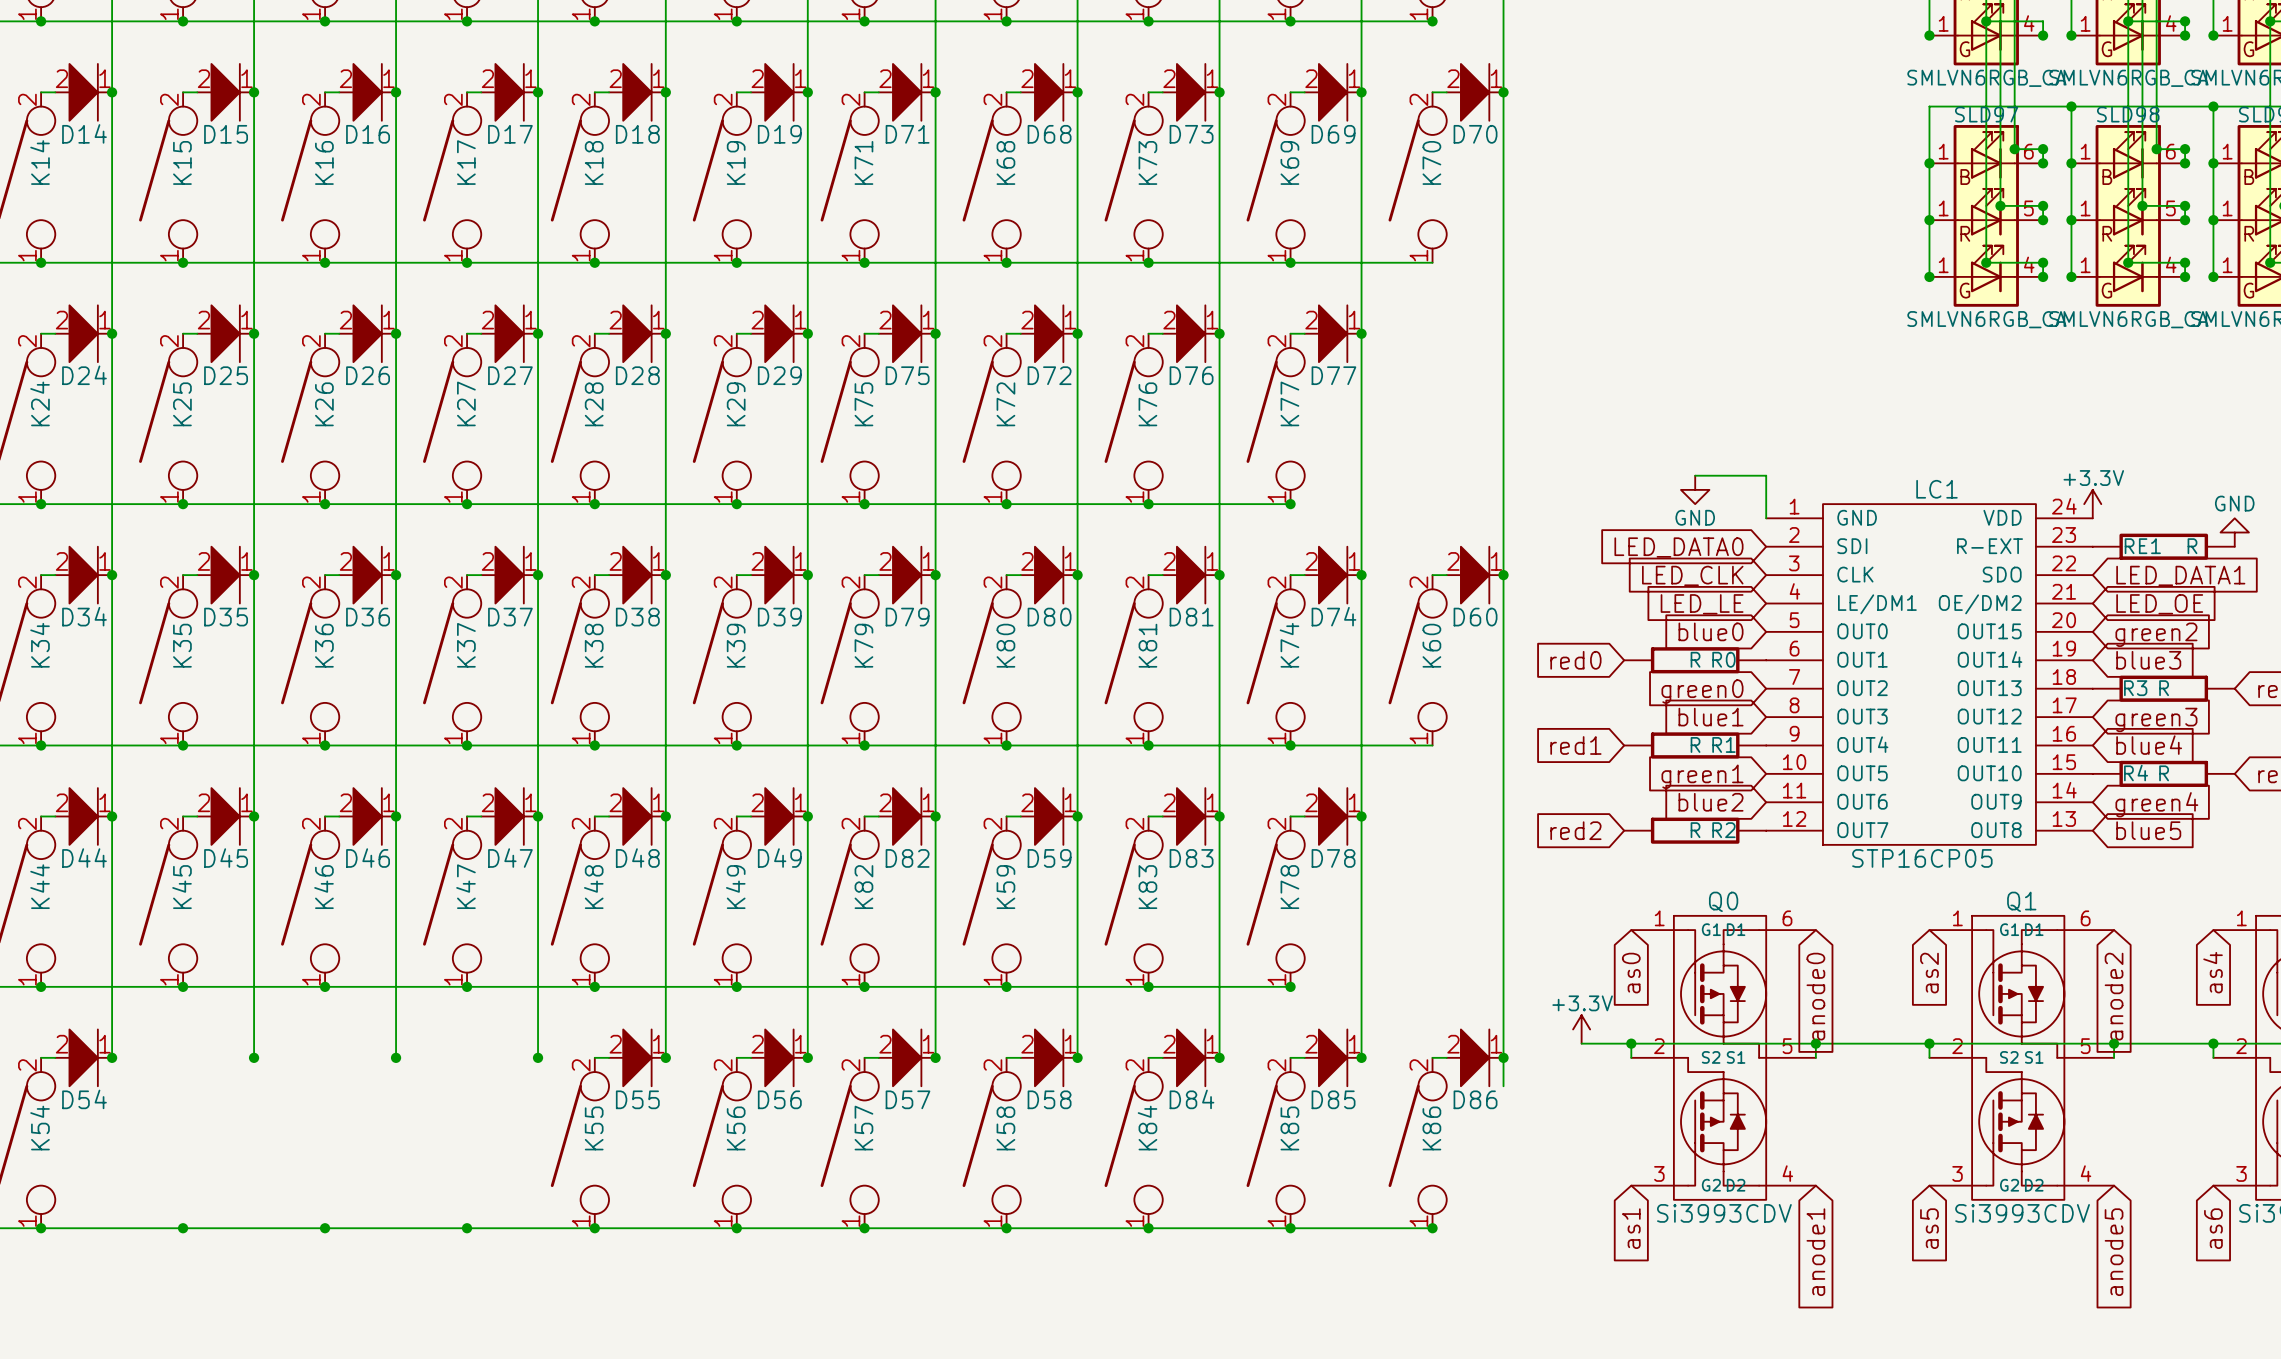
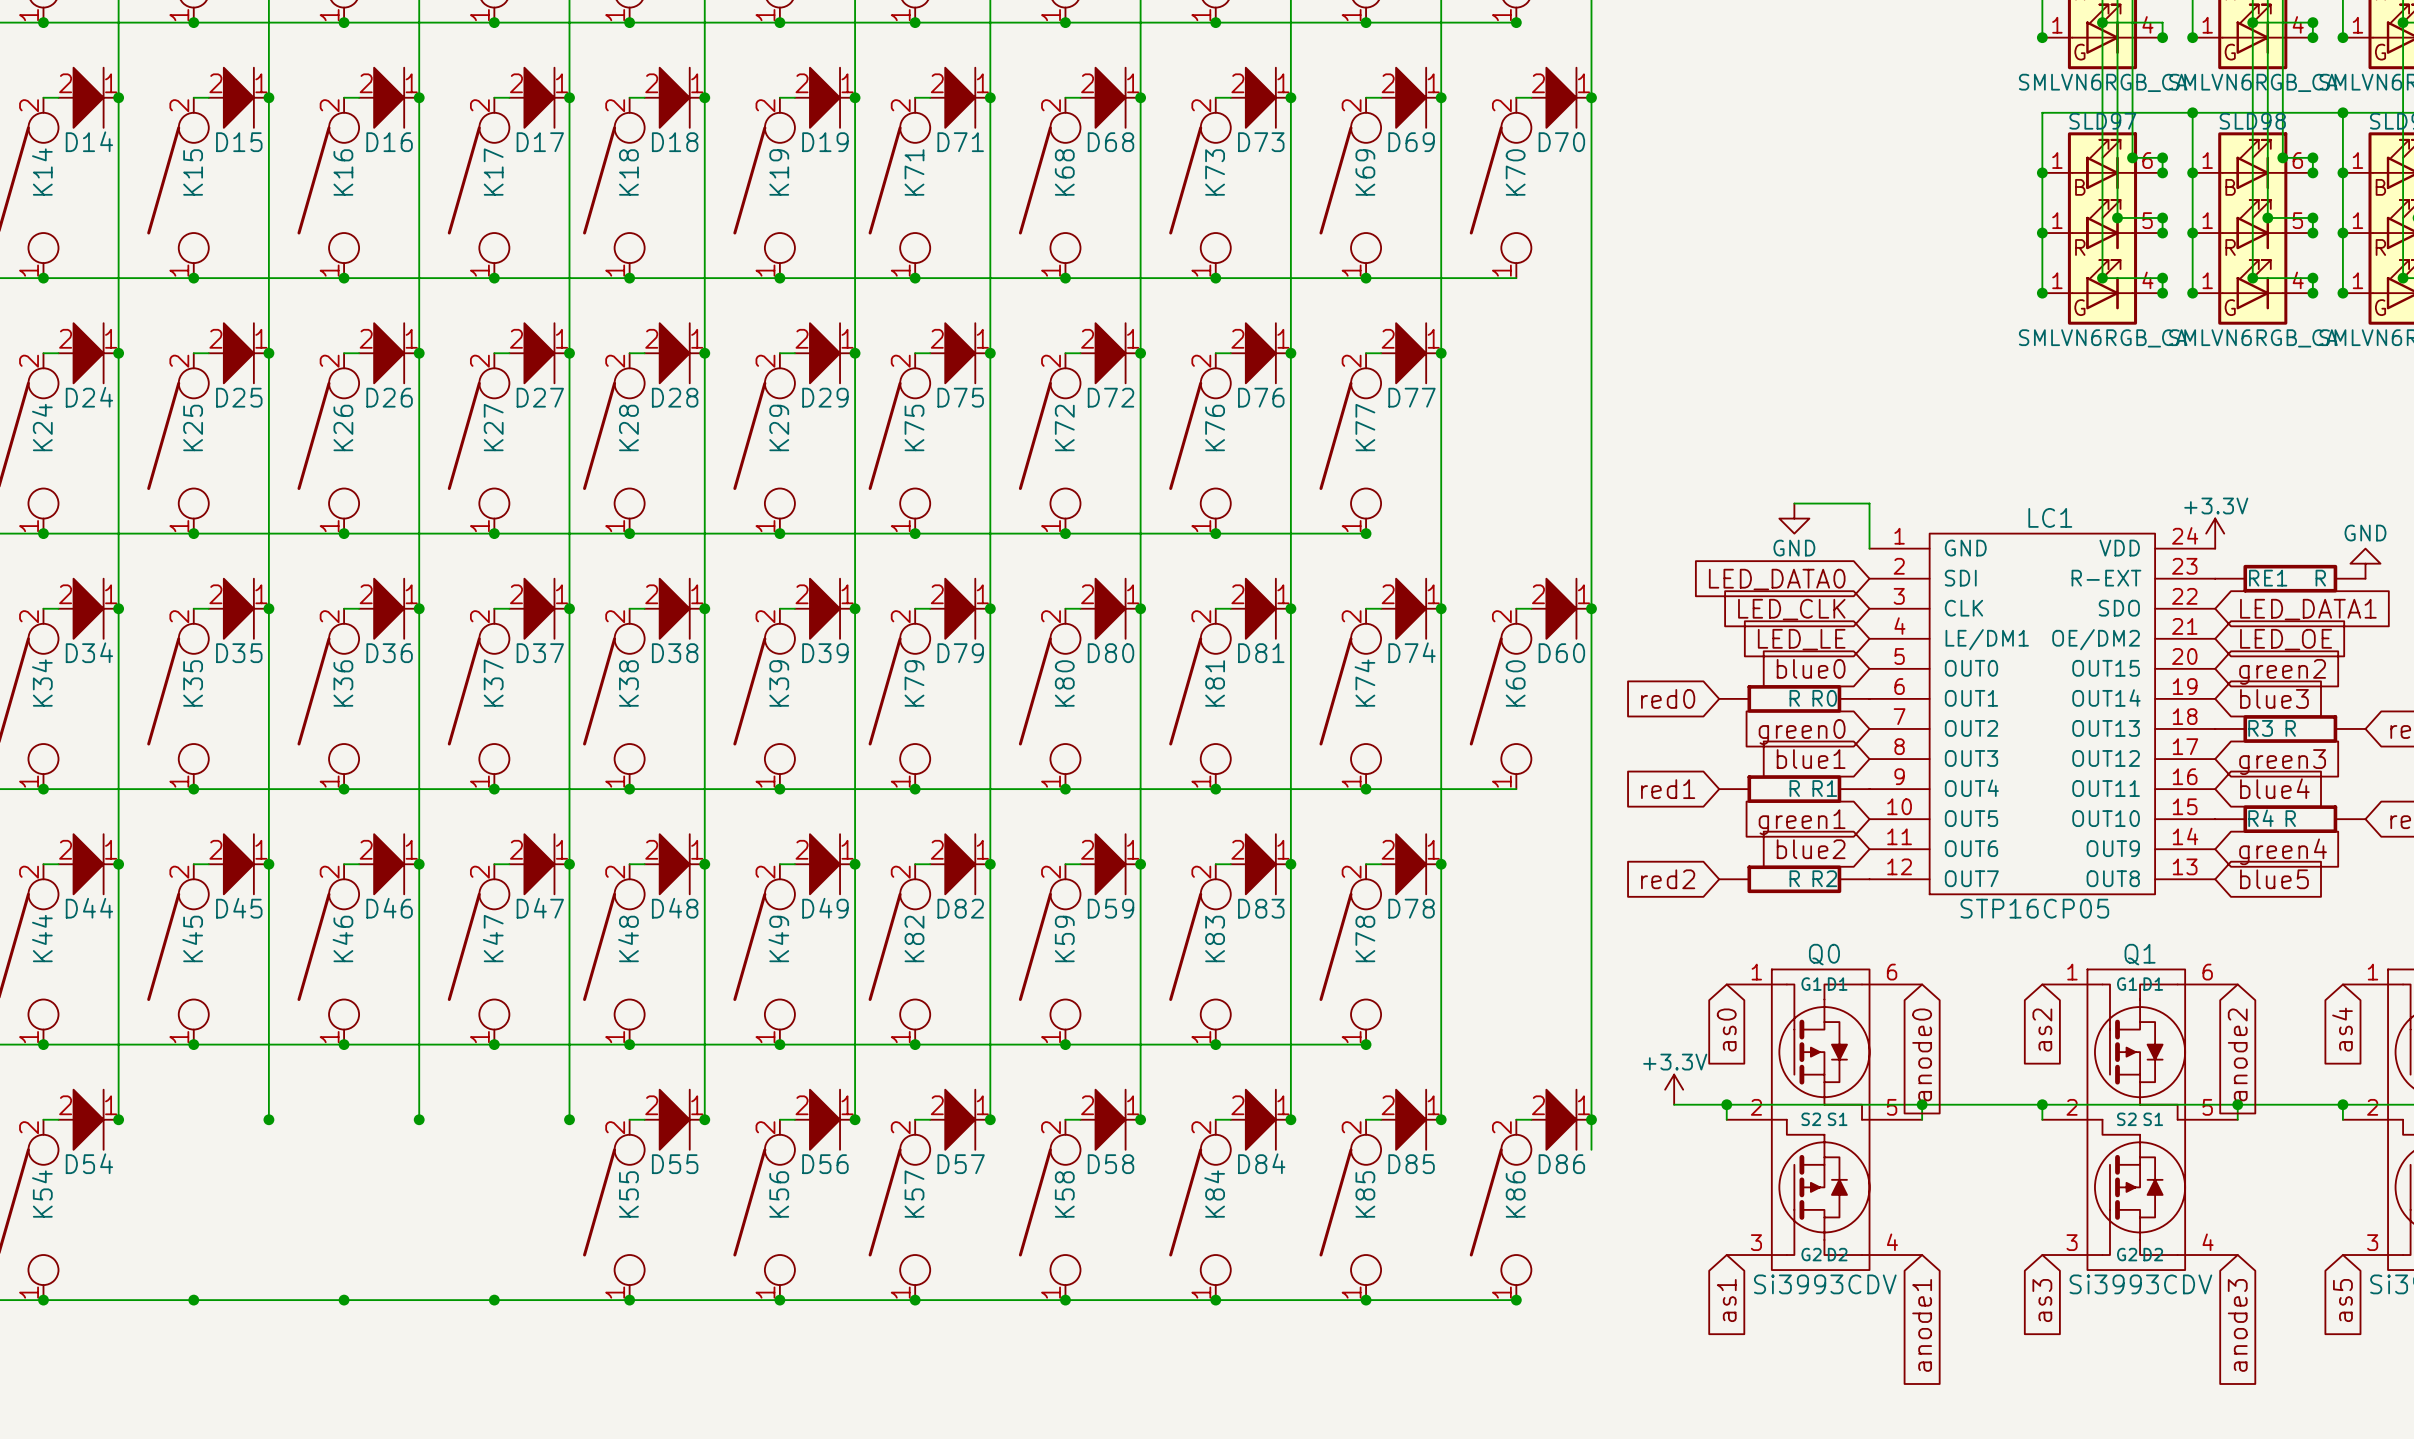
global label: as5 (1929, 1228) -> as3 (2042, 1300)
global label: as6 (2213, 1228) -> as5 (2342, 1300)
global label: anode5 (2114, 1252) -> anode3 (2237, 1325)

